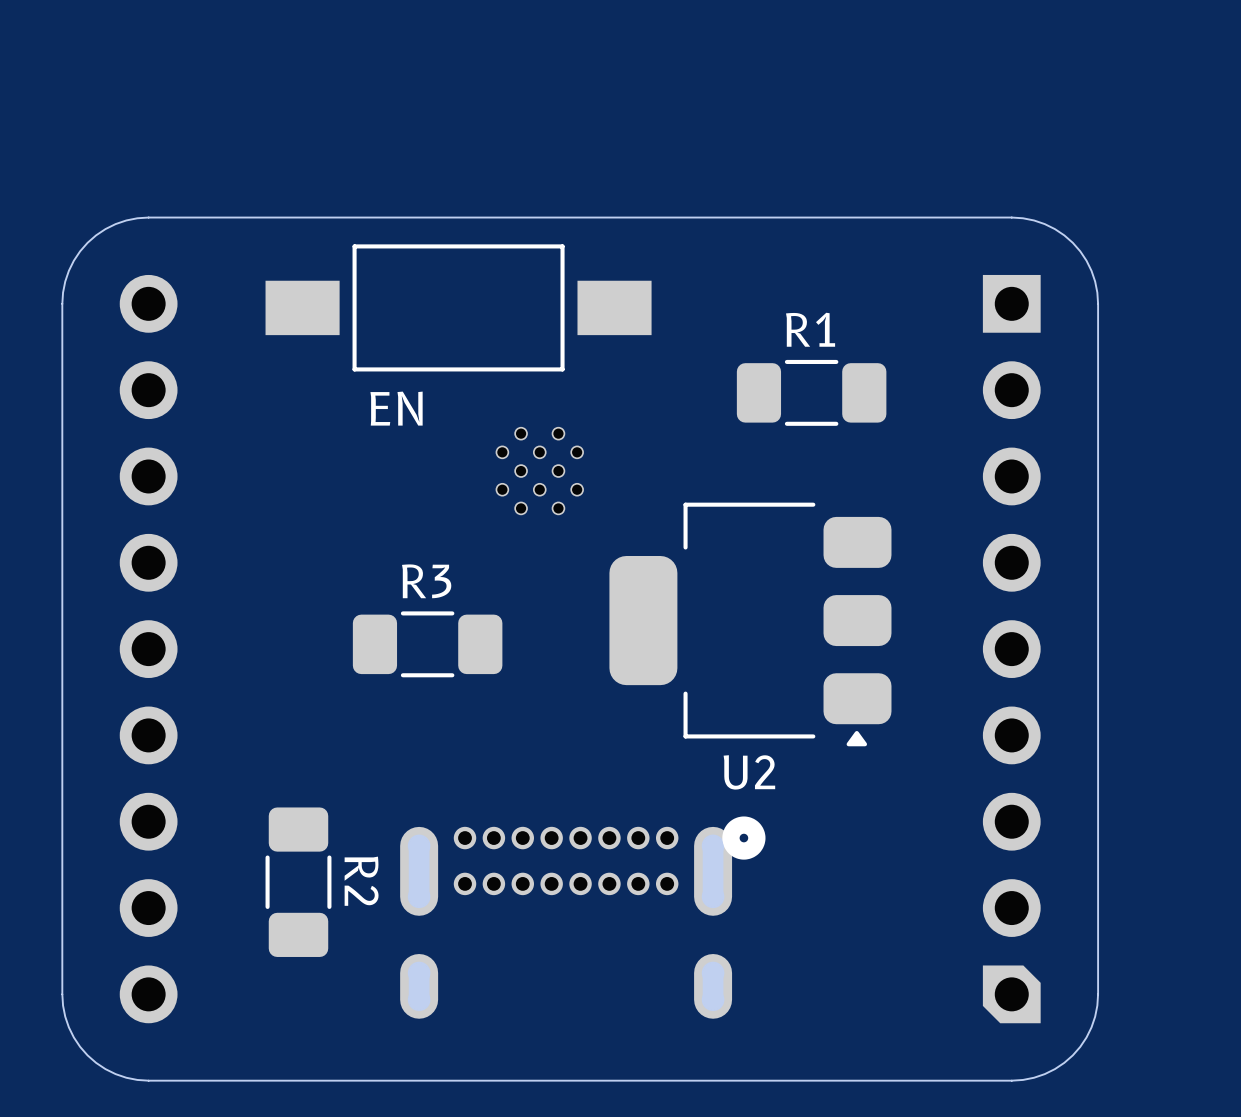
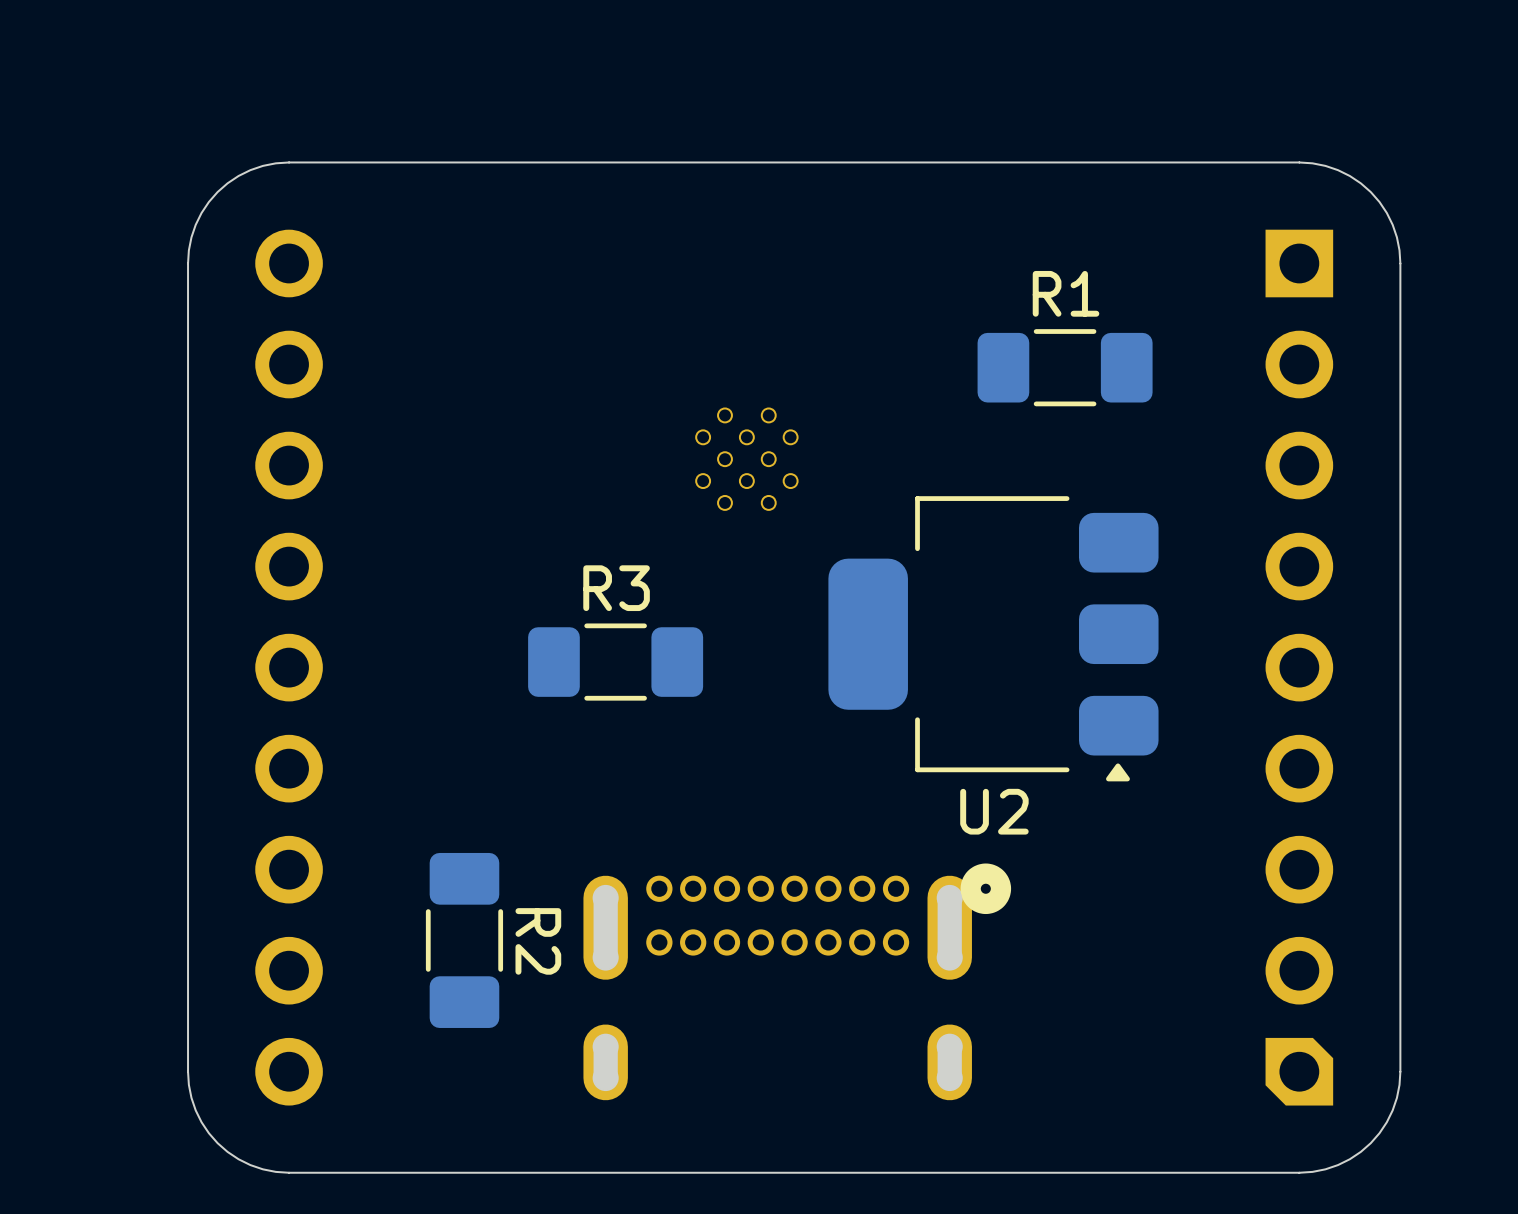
EN: (458, 307) -> none

